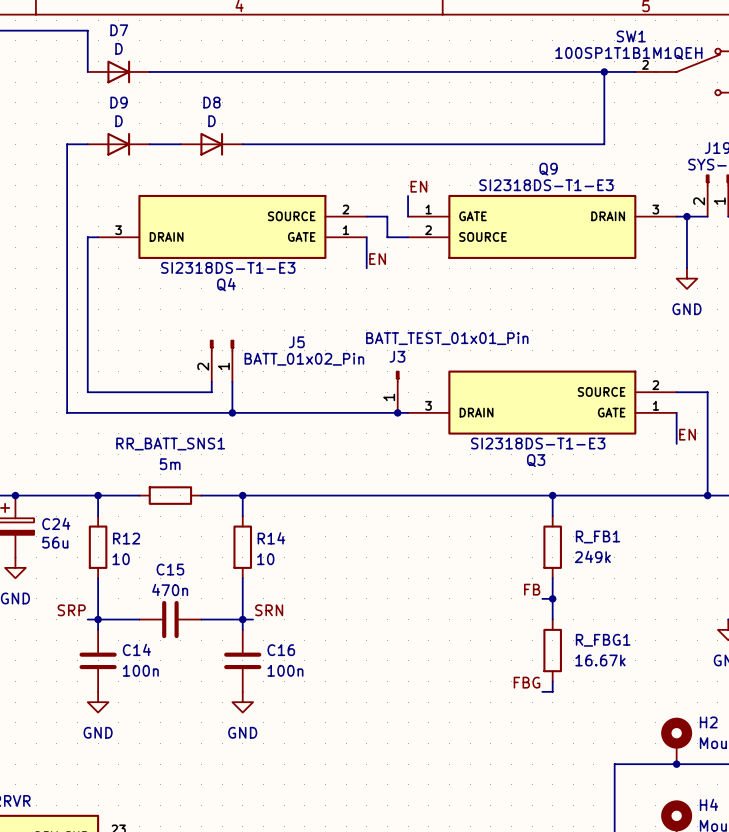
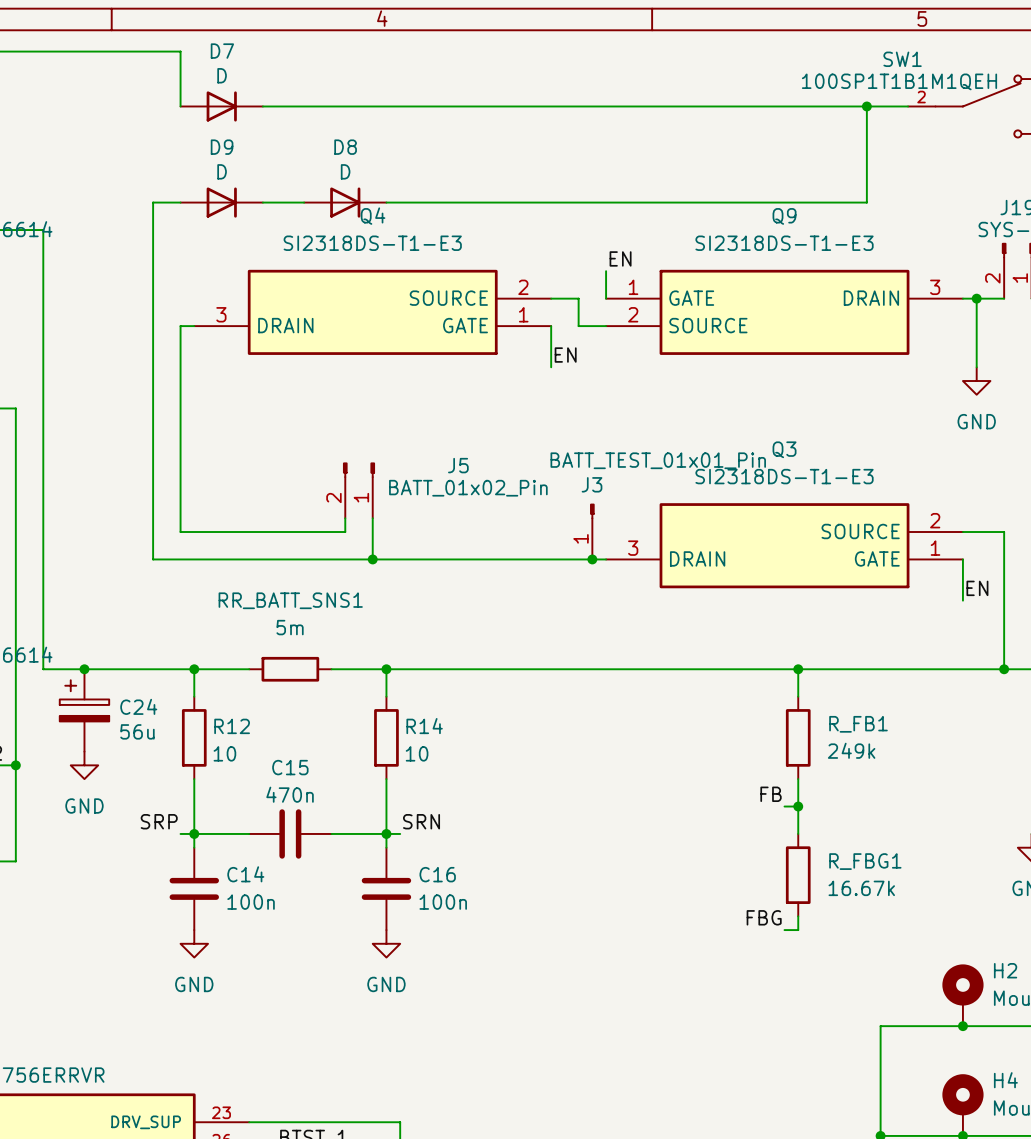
Q4 symbol: [98, 194, 367, 259] -> [194, 269, 552, 355]
Q9 symbol: [408, 194, 677, 259] -> [606, 269, 963, 355]
Q4 value position: SI2318DS-T1-E3 (228, 267) -> SI2318DS-T1-E3 (372, 243)
Q4 name position: Q4 (226, 284) -> Q4 (373, 216)
Q3 symbol: [408, 370, 677, 435] -> [606, 503, 963, 589]
Q3 value position: SI2318DS-T1-E3 (538, 443) -> SI2318DS-T1-E3 (784, 476)
Q3 name position: Q3 (536, 460) -> Q3 (784, 449)

